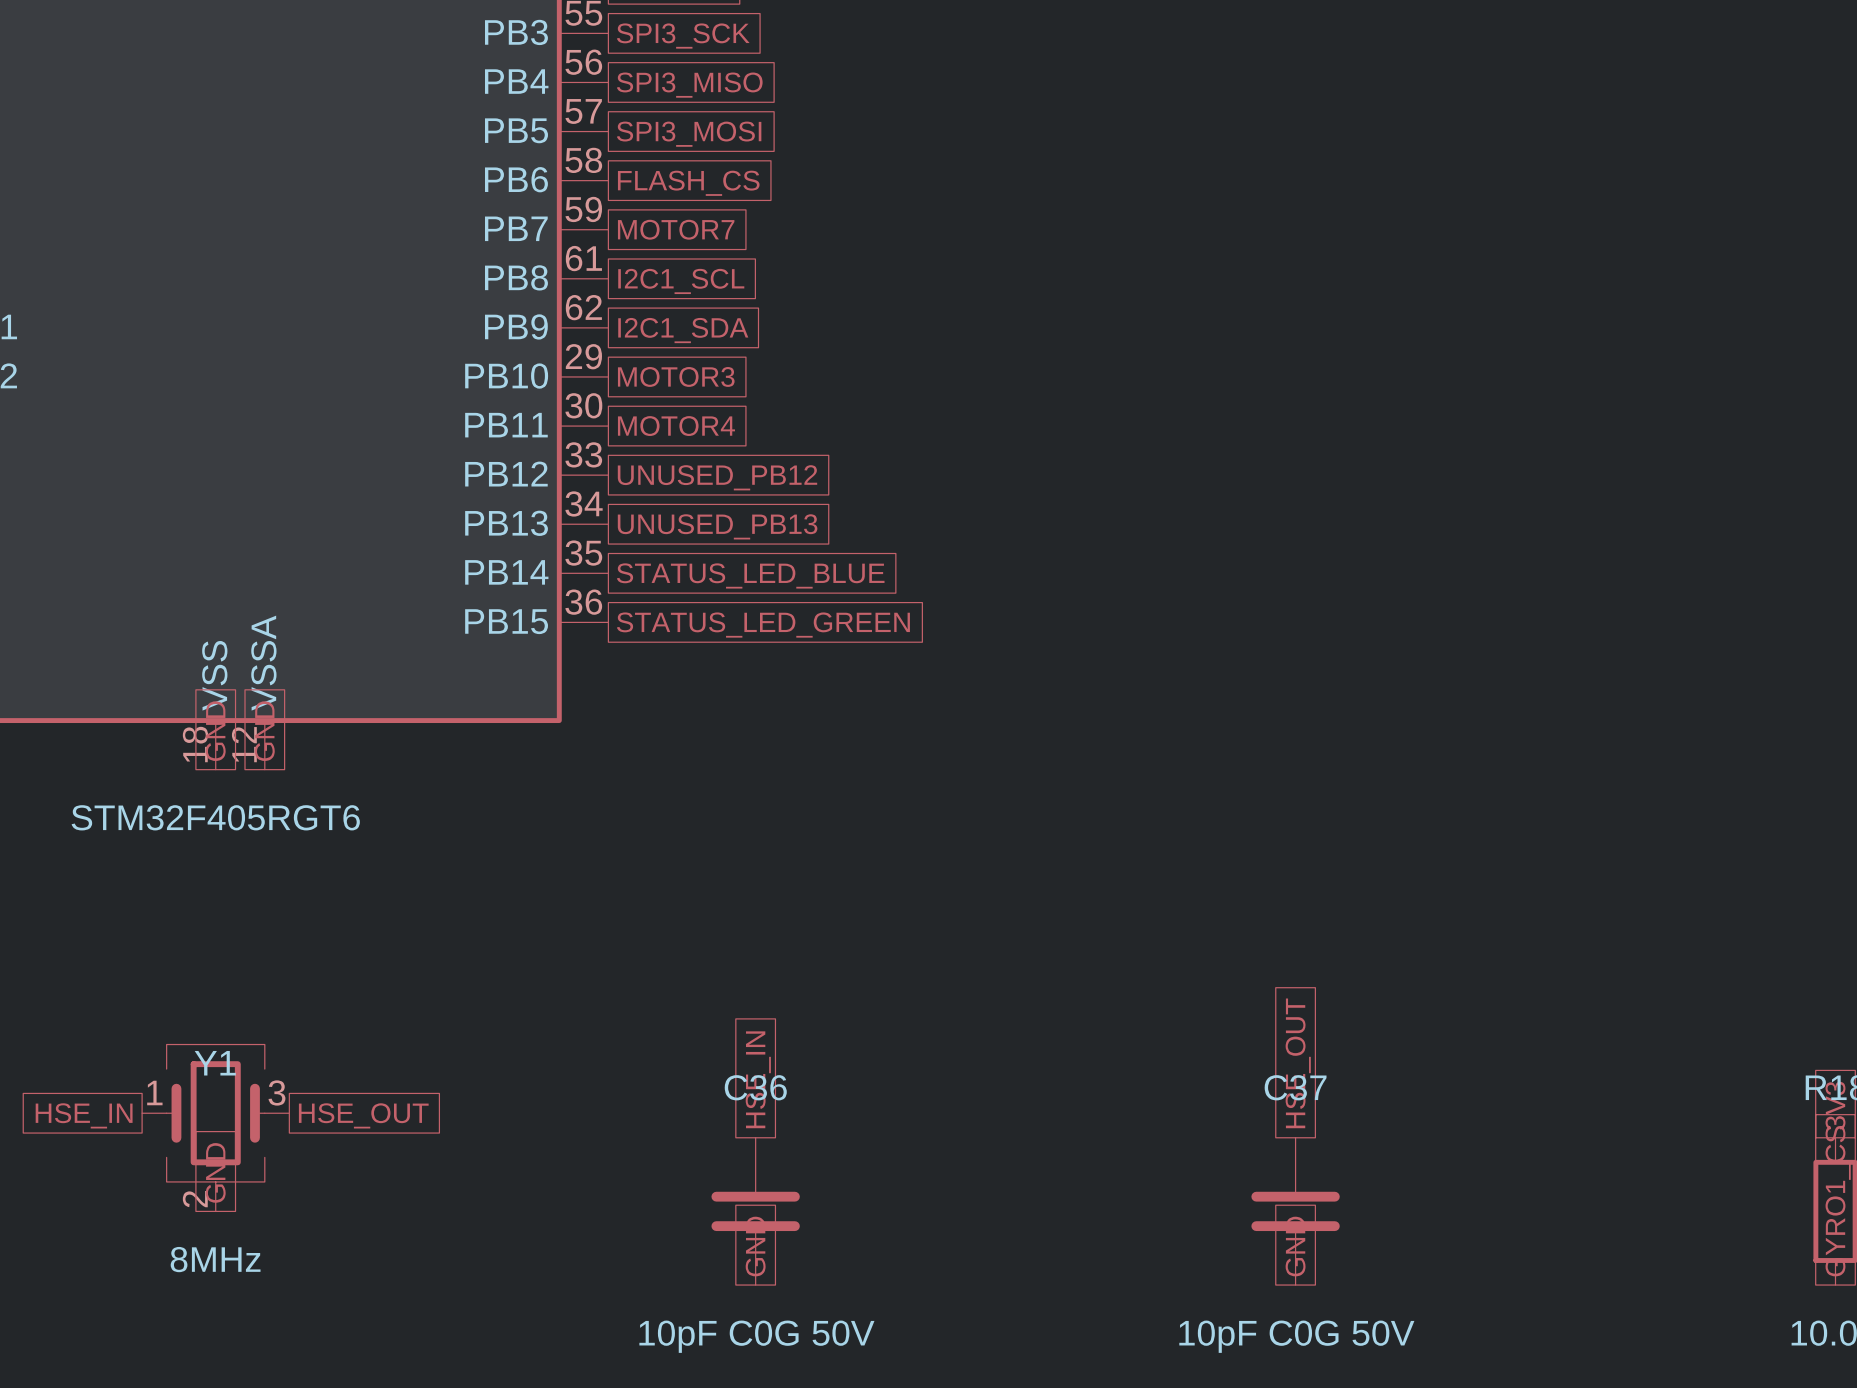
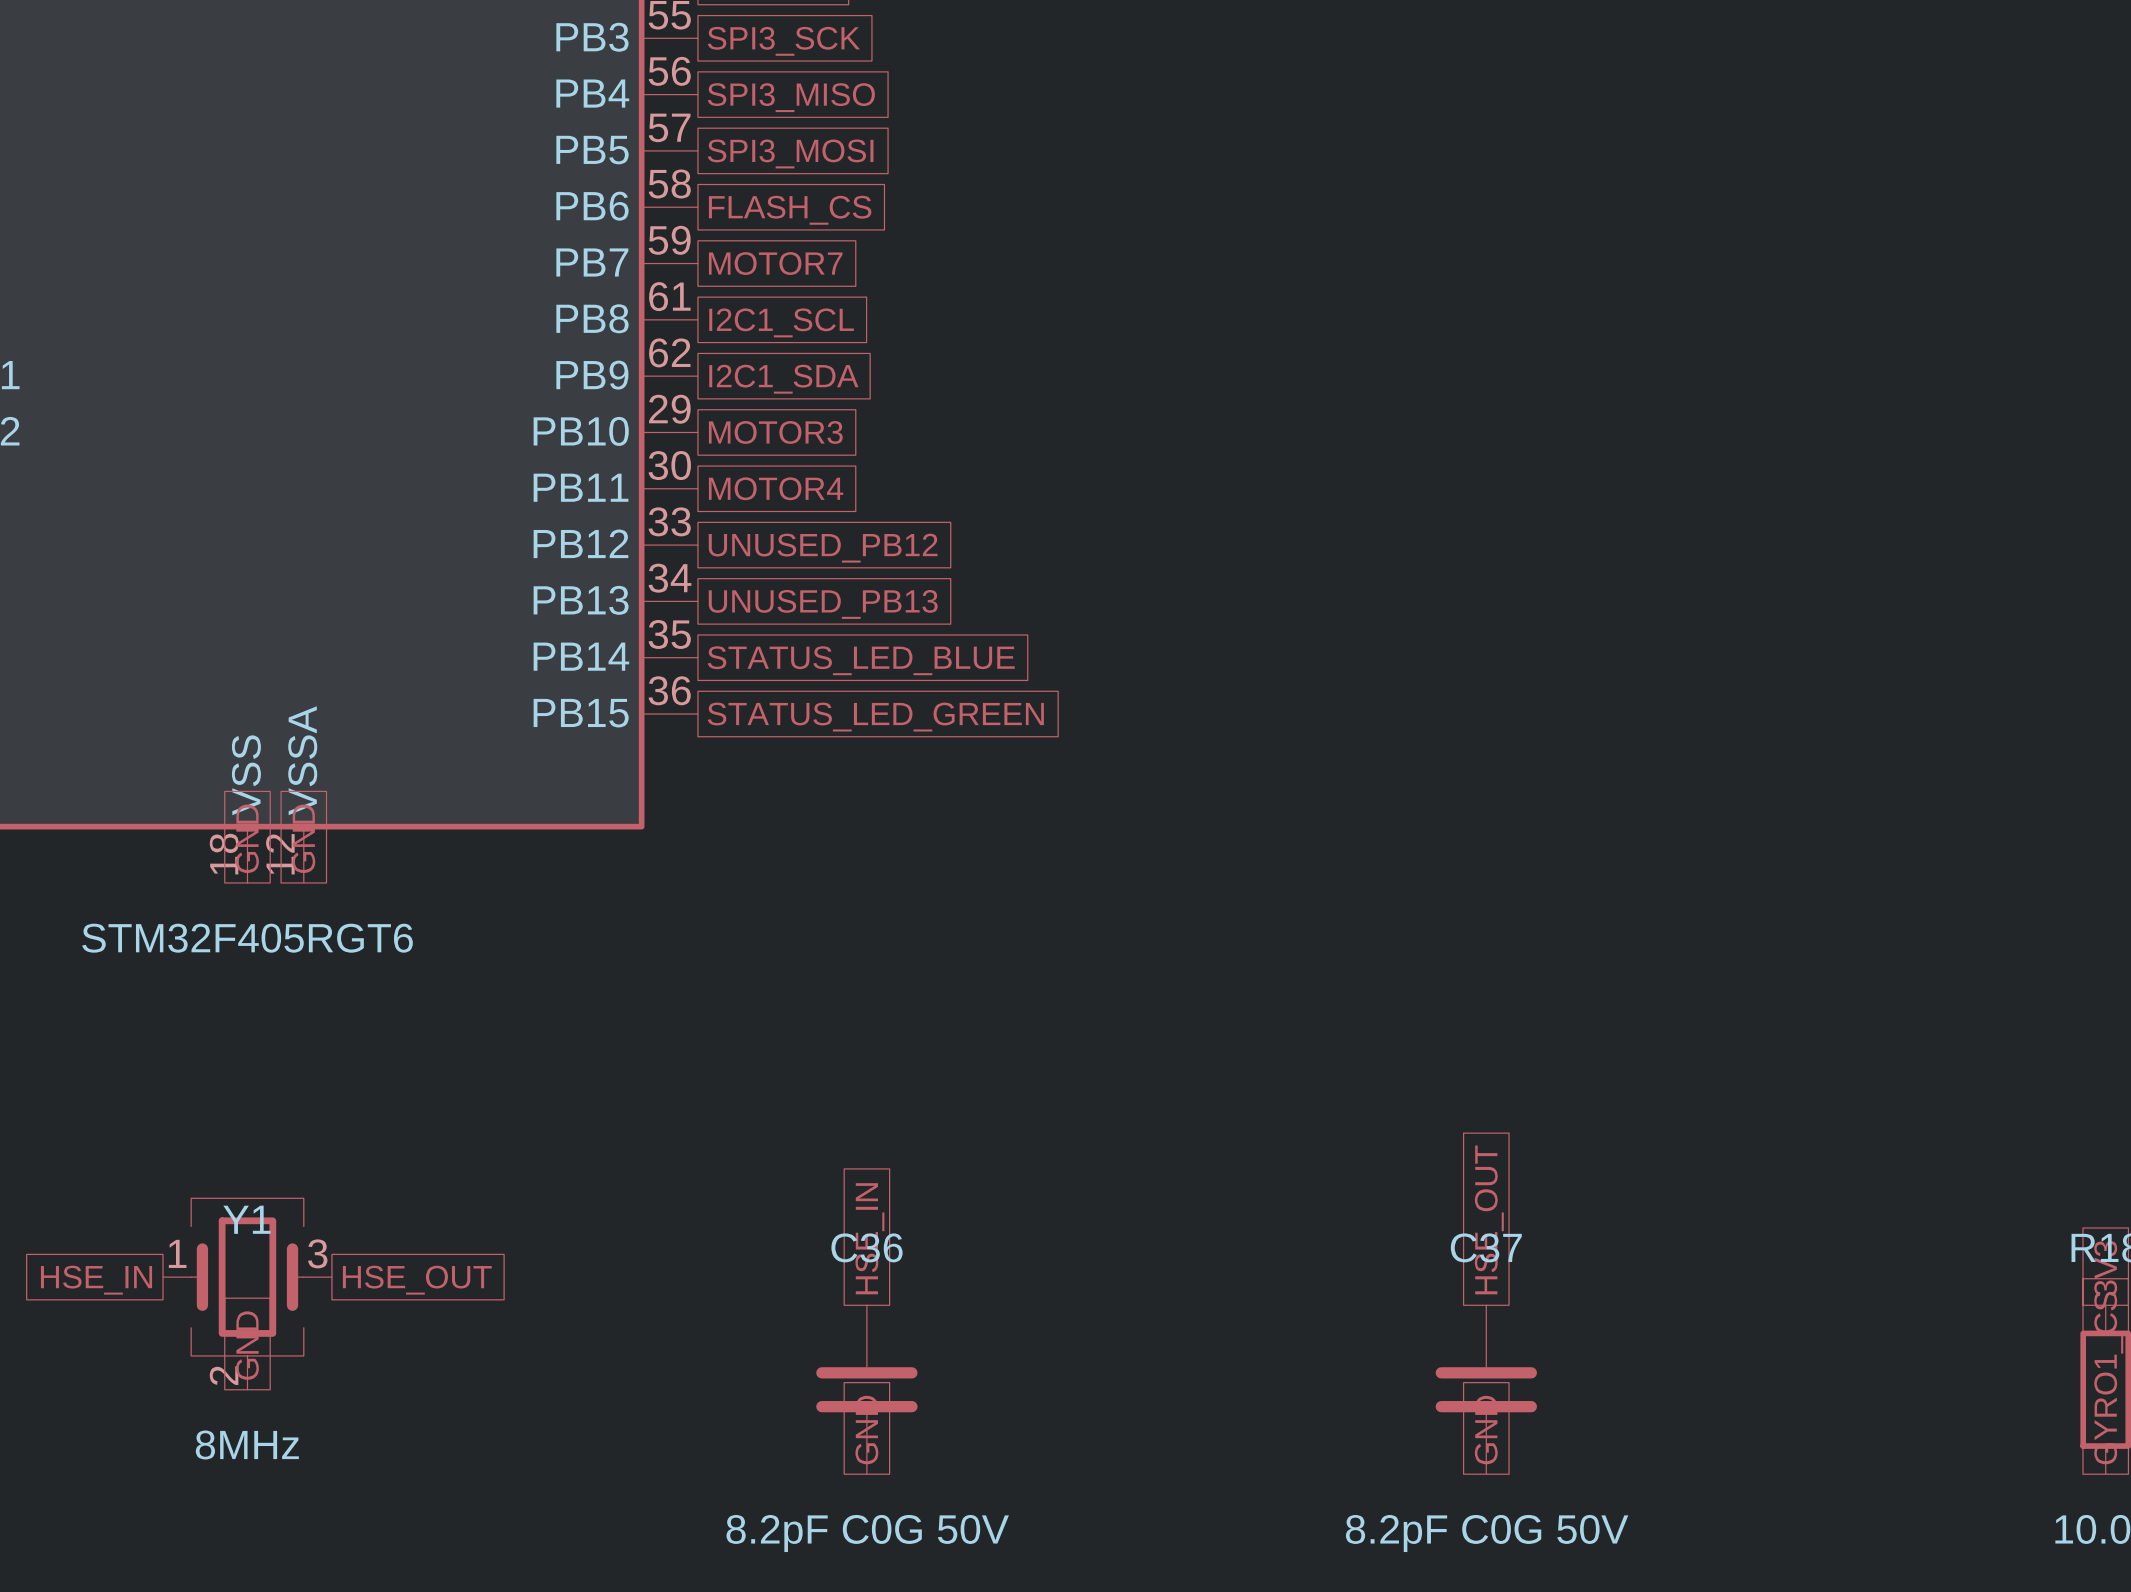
C36 value: 10pF C0G 50V (756, 1336) -> 8.2pF C0G 50V (867, 1533)
C37 value: 10pF C0G 50V (1296, 1336) -> 8.2pF C0G 50V (1487, 1533)

